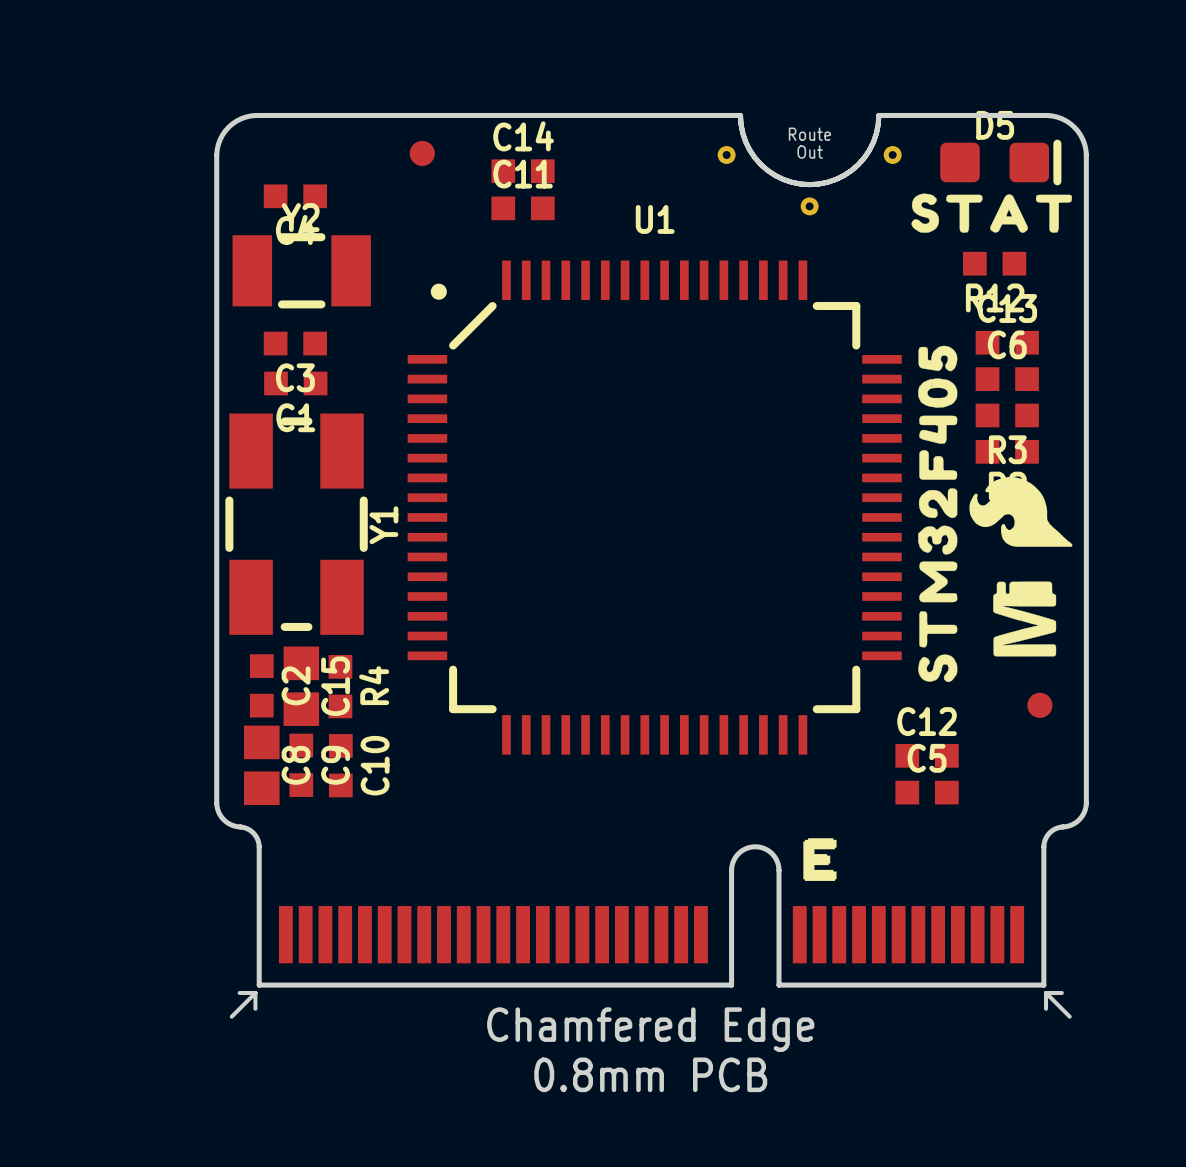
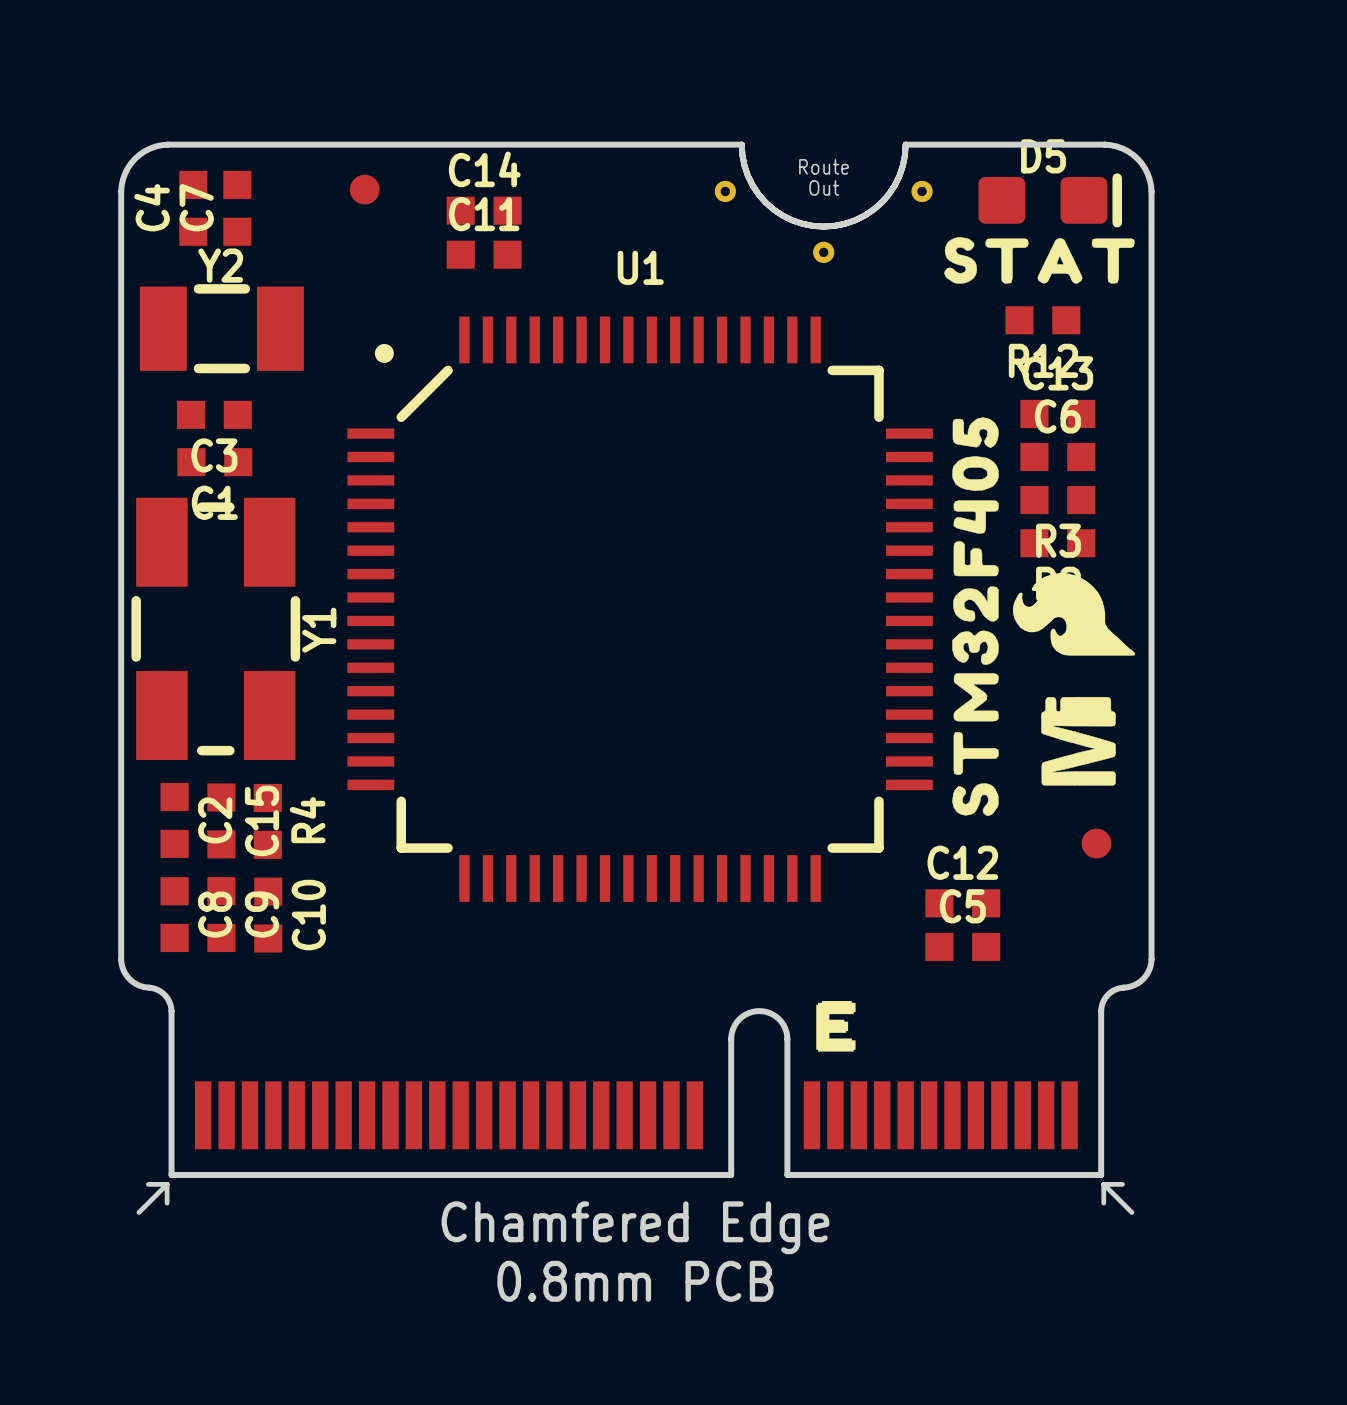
C7: none -> (237, 208)
C4 rotation: 0° (295, 196) -> 90° clockwise (193, 208)
C15 footprint: [283, 646, 320, 726] -> [207, 783, 236, 859]
C8 footprint: [243, 725, 280, 806] -> [160, 877, 189, 953]

